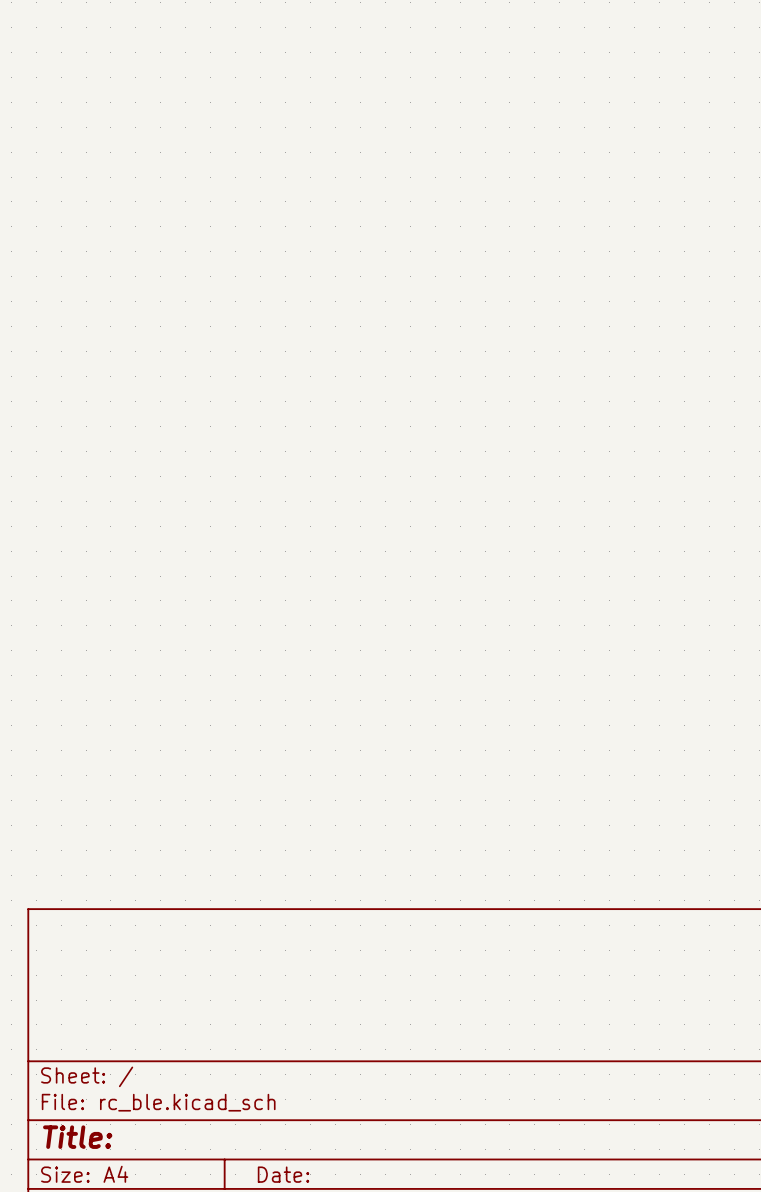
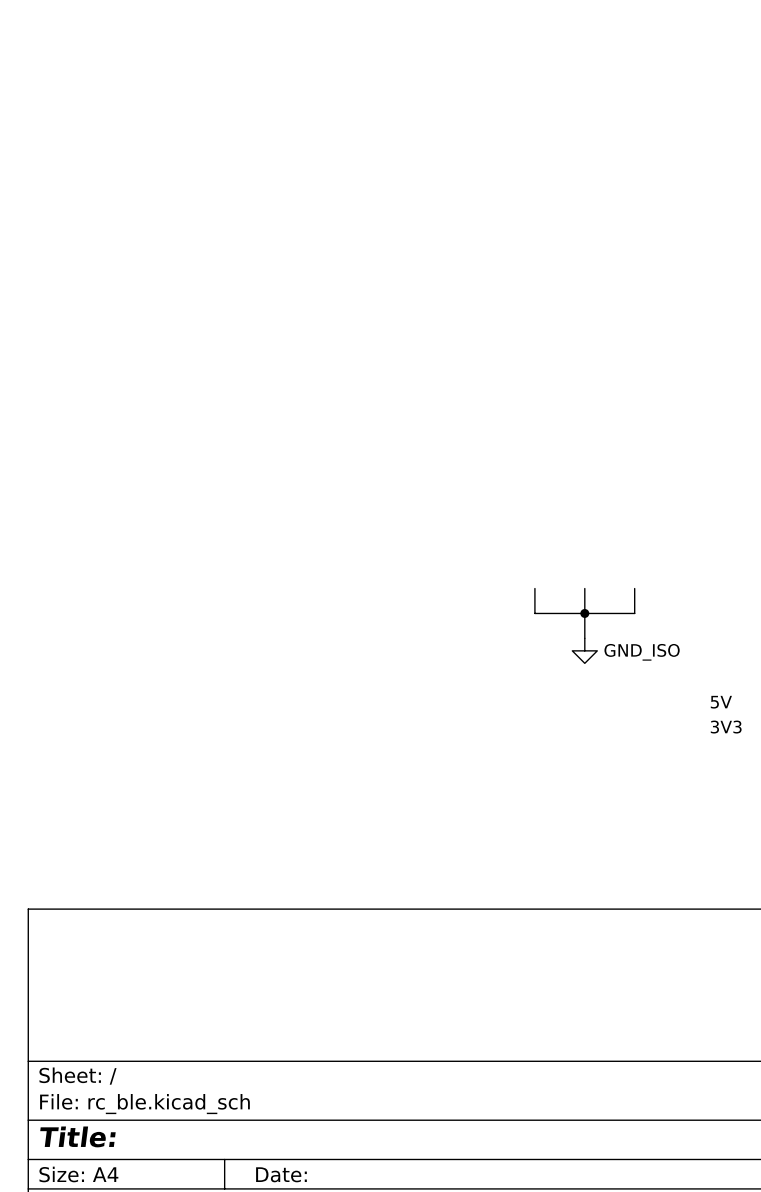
wire: none -> (534, 588) (534, 613) (634, 613) (634, 588)
wire: none -> (584, 588) (584, 638)
junction: none -> (584, 613)
power symbol: none -> GND_ISO (584, 650)
label: none -> 5V (721, 702)
label: none -> 3V3 (726, 727)

